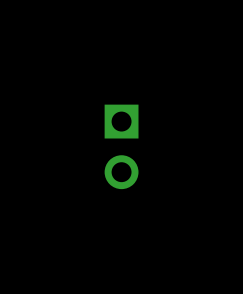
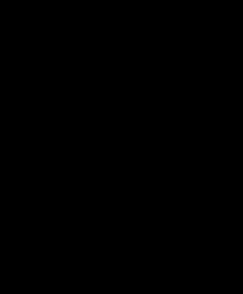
part: (121, 146) -> none

